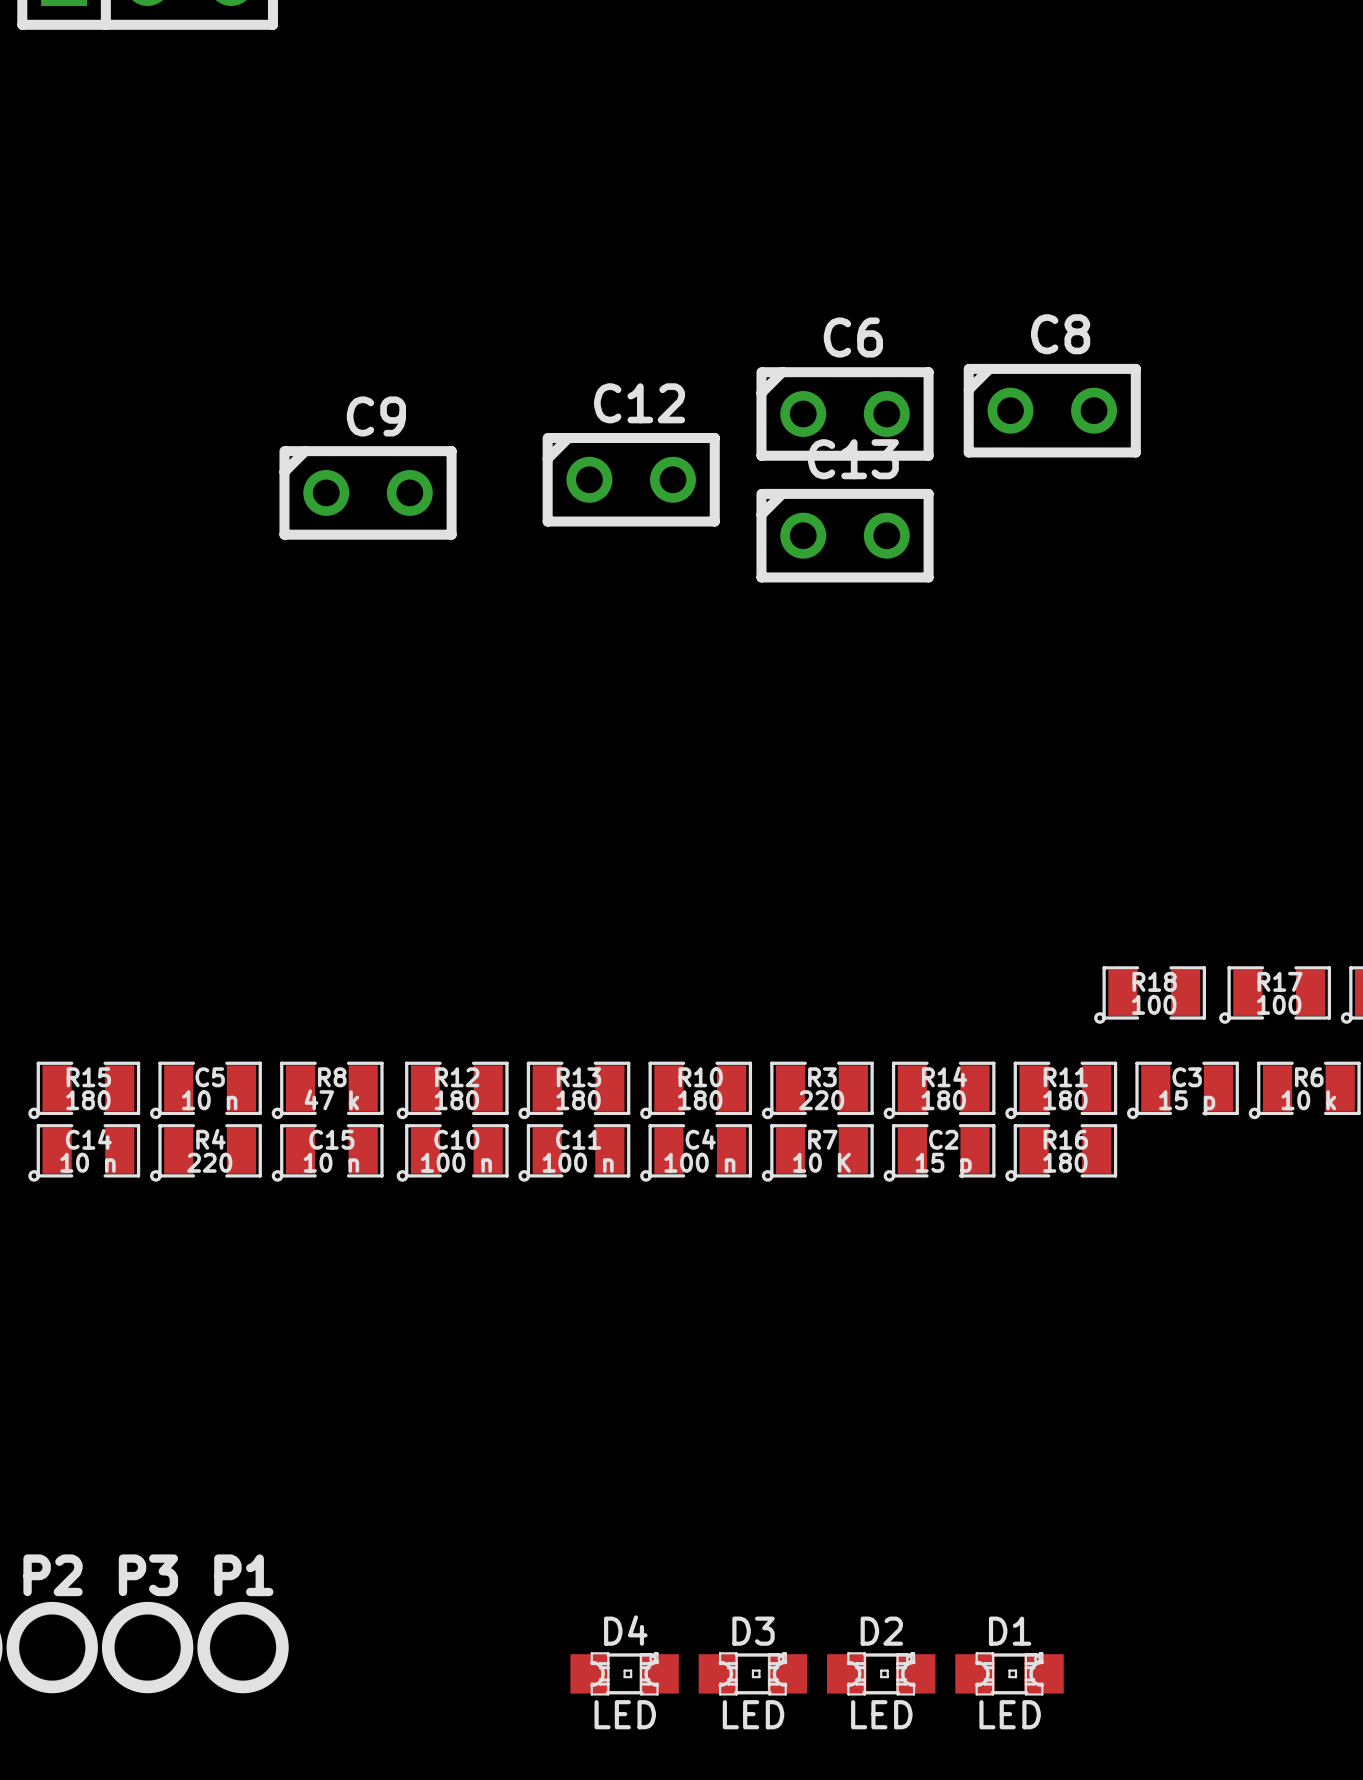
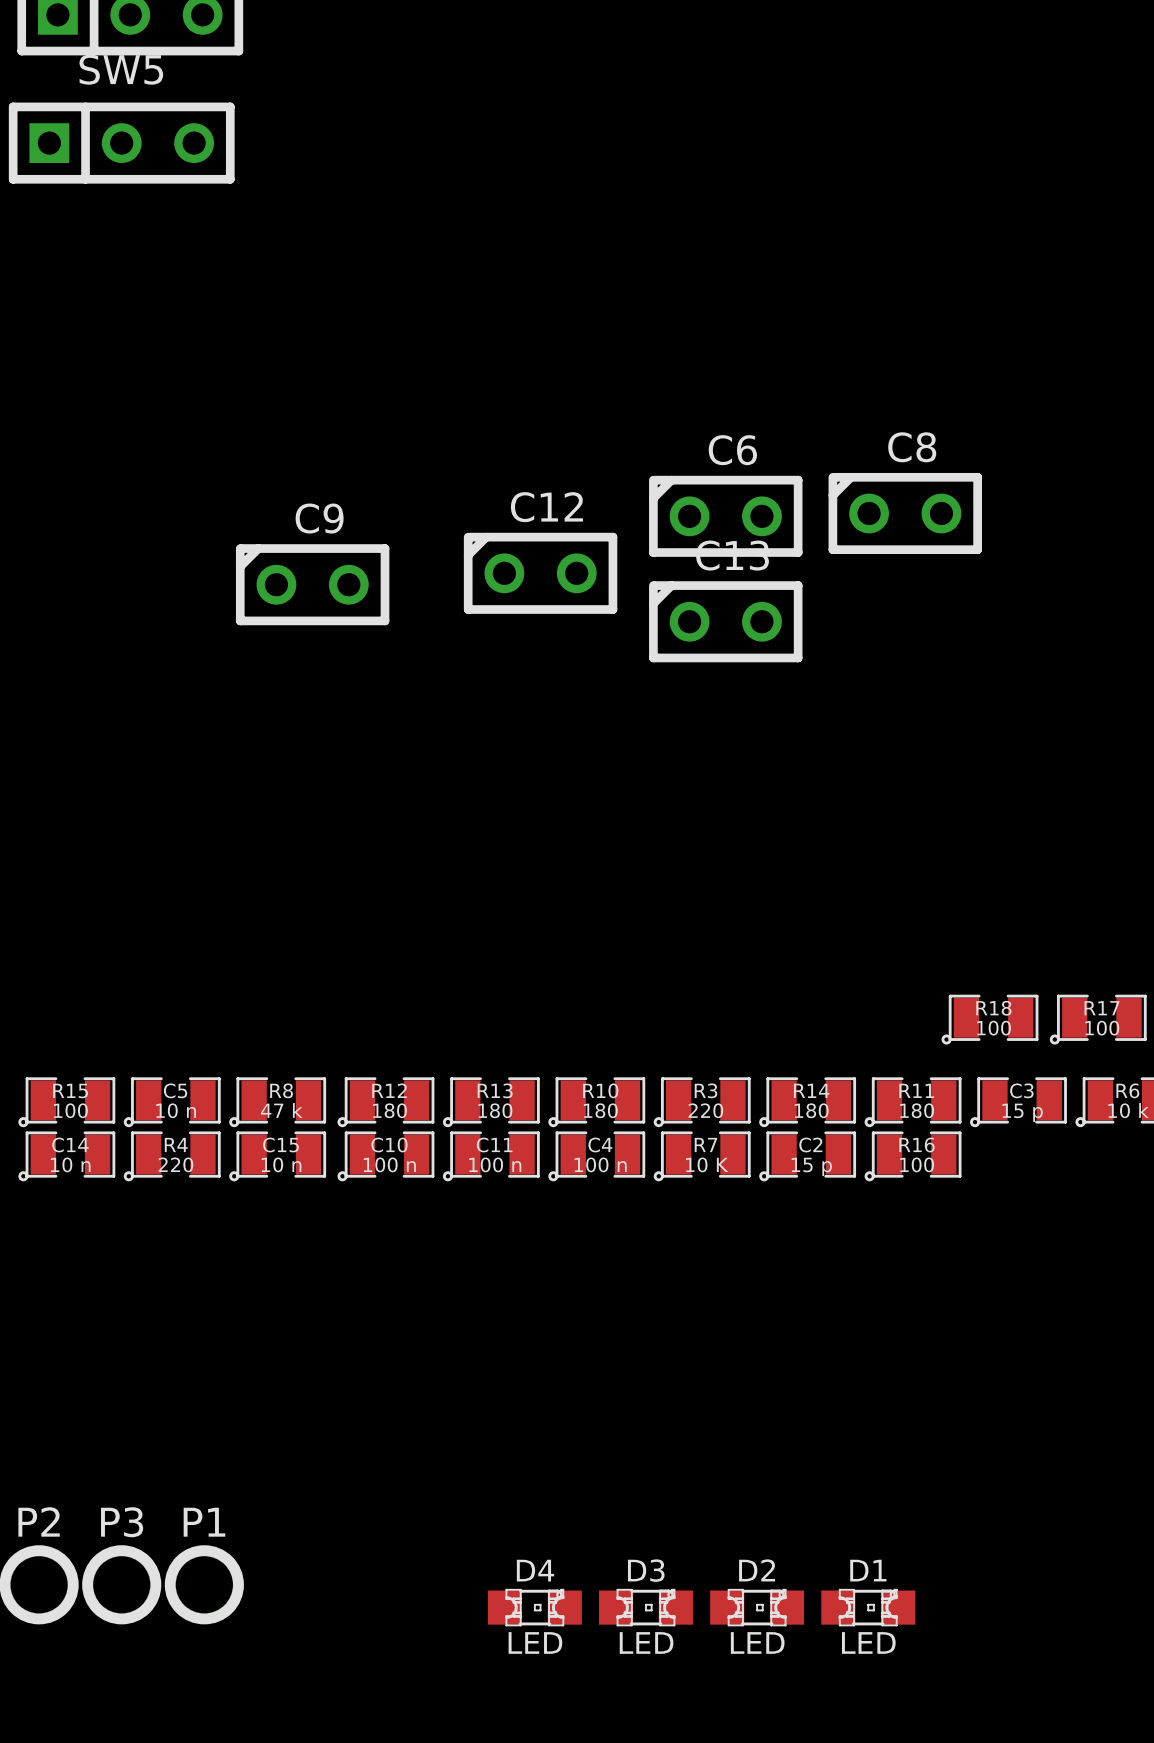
R15 value: 180 (88, 1100) -> 100 (70, 1110)
R16 value: 180 (1065, 1162) -> 100 (917, 1164)

